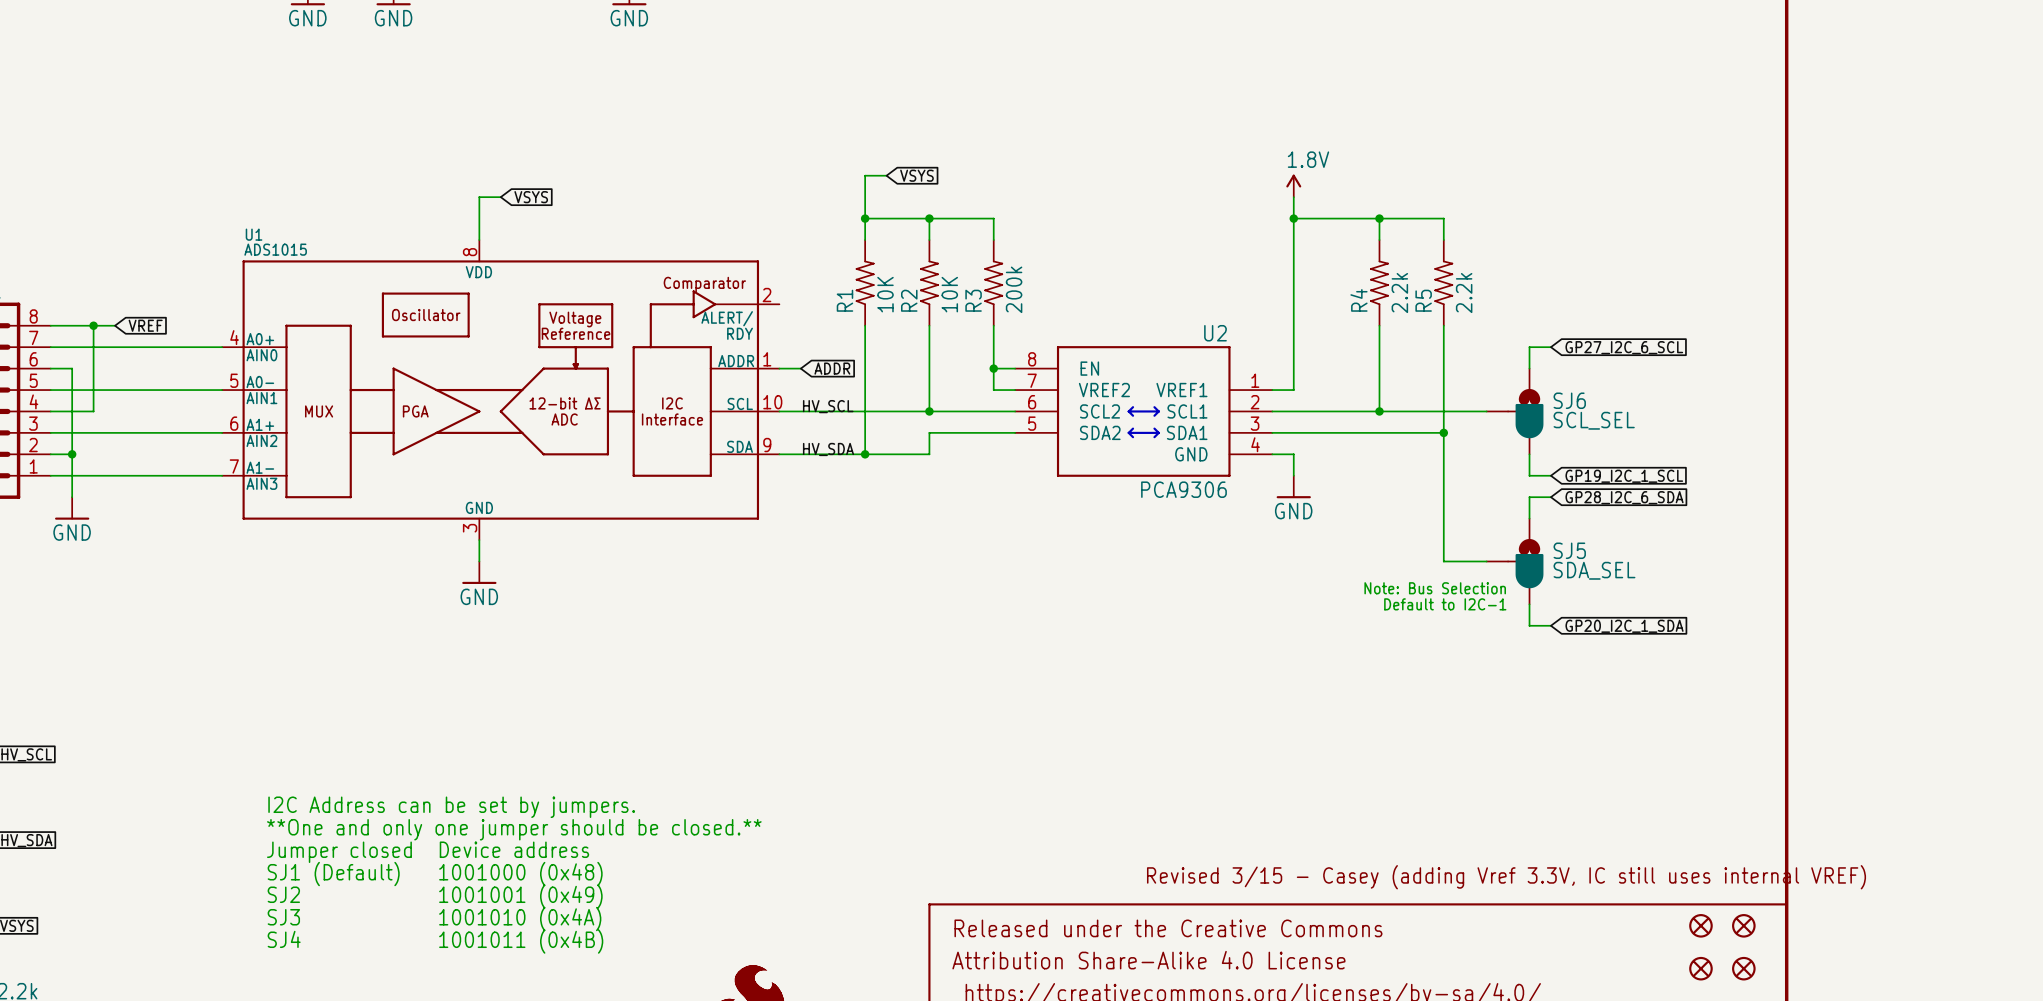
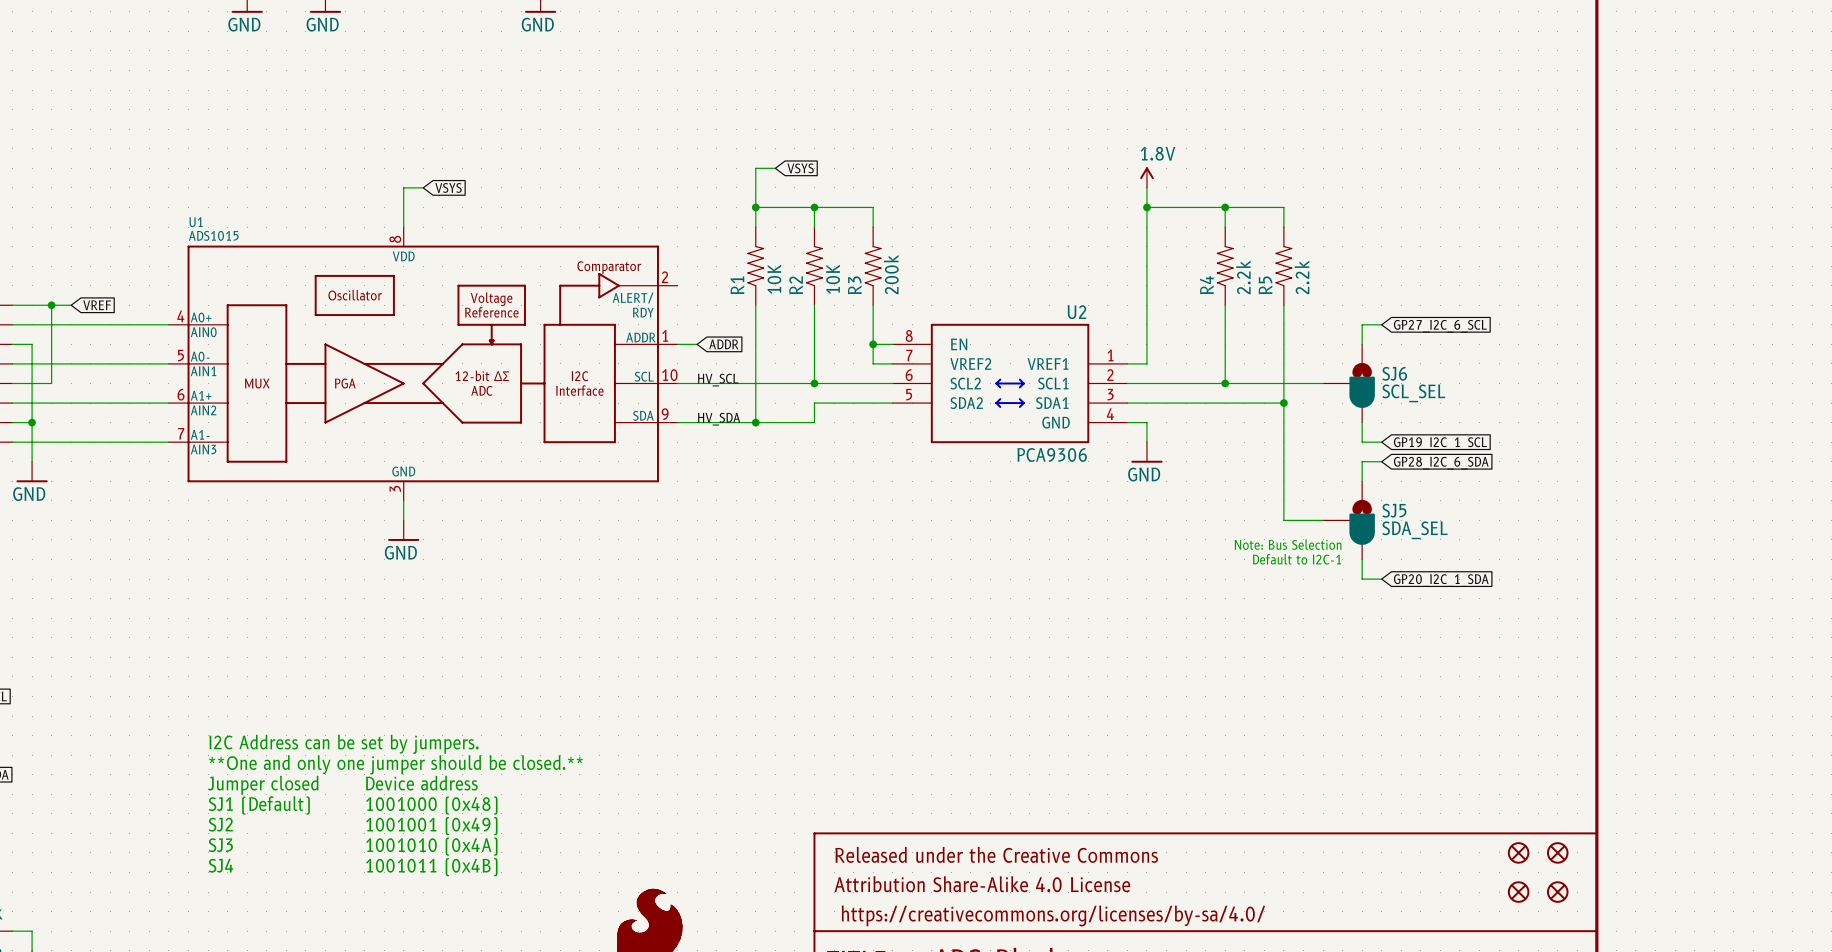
text: Revised 3/15 - Casey (adding Vref 3.3V, IC still uses internal VREF) (1506, 877) -> none

